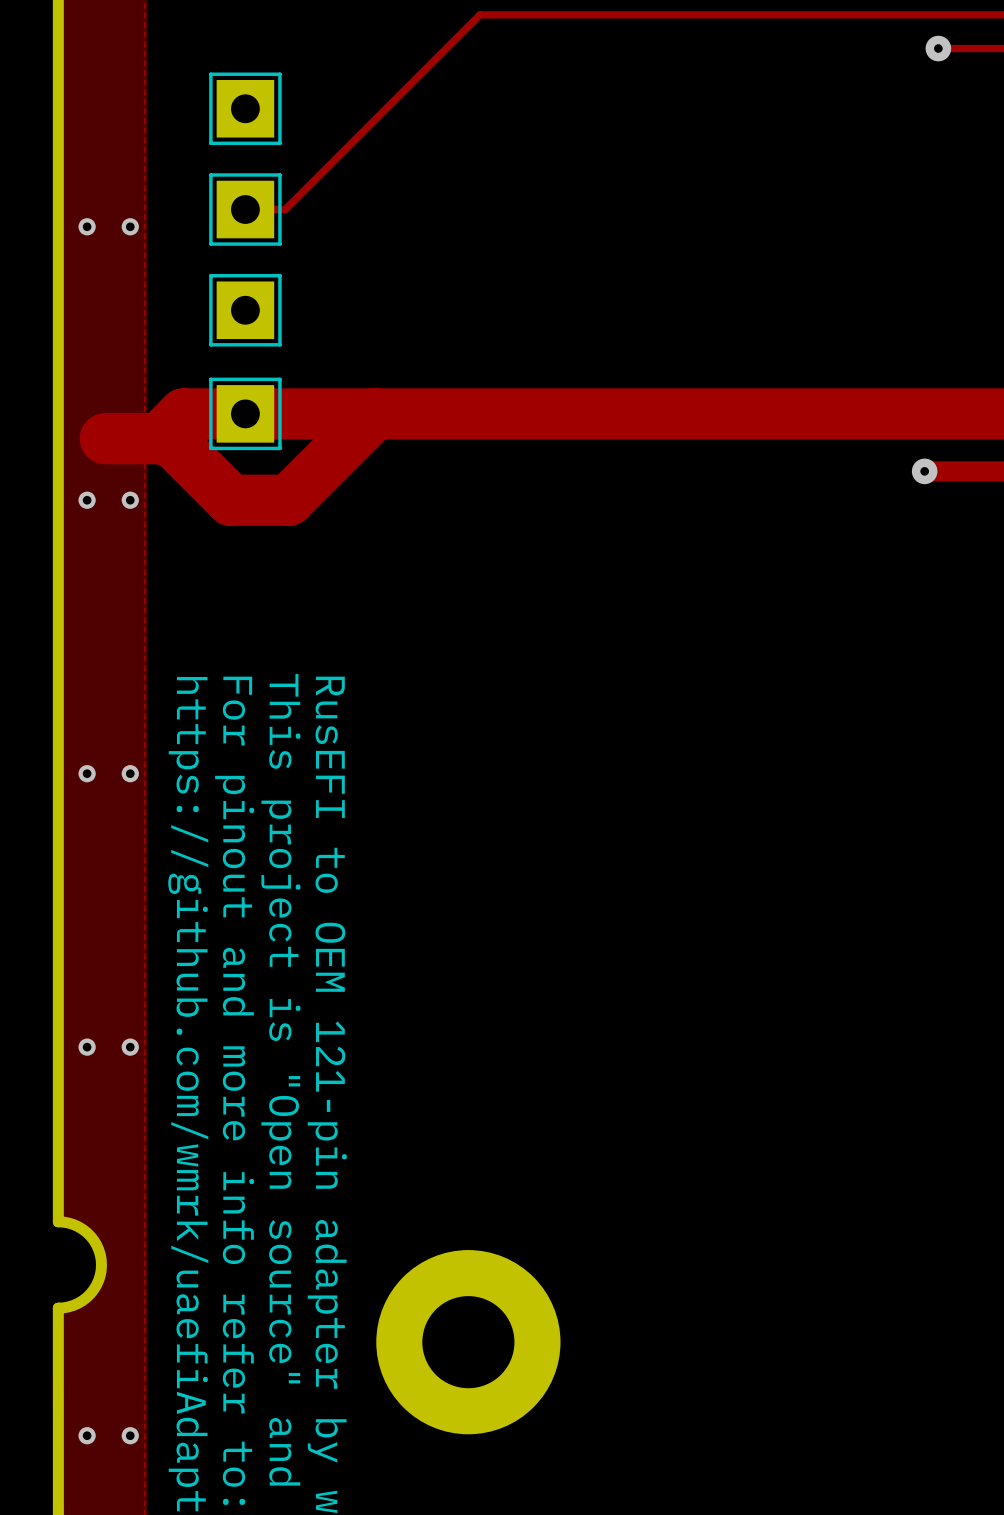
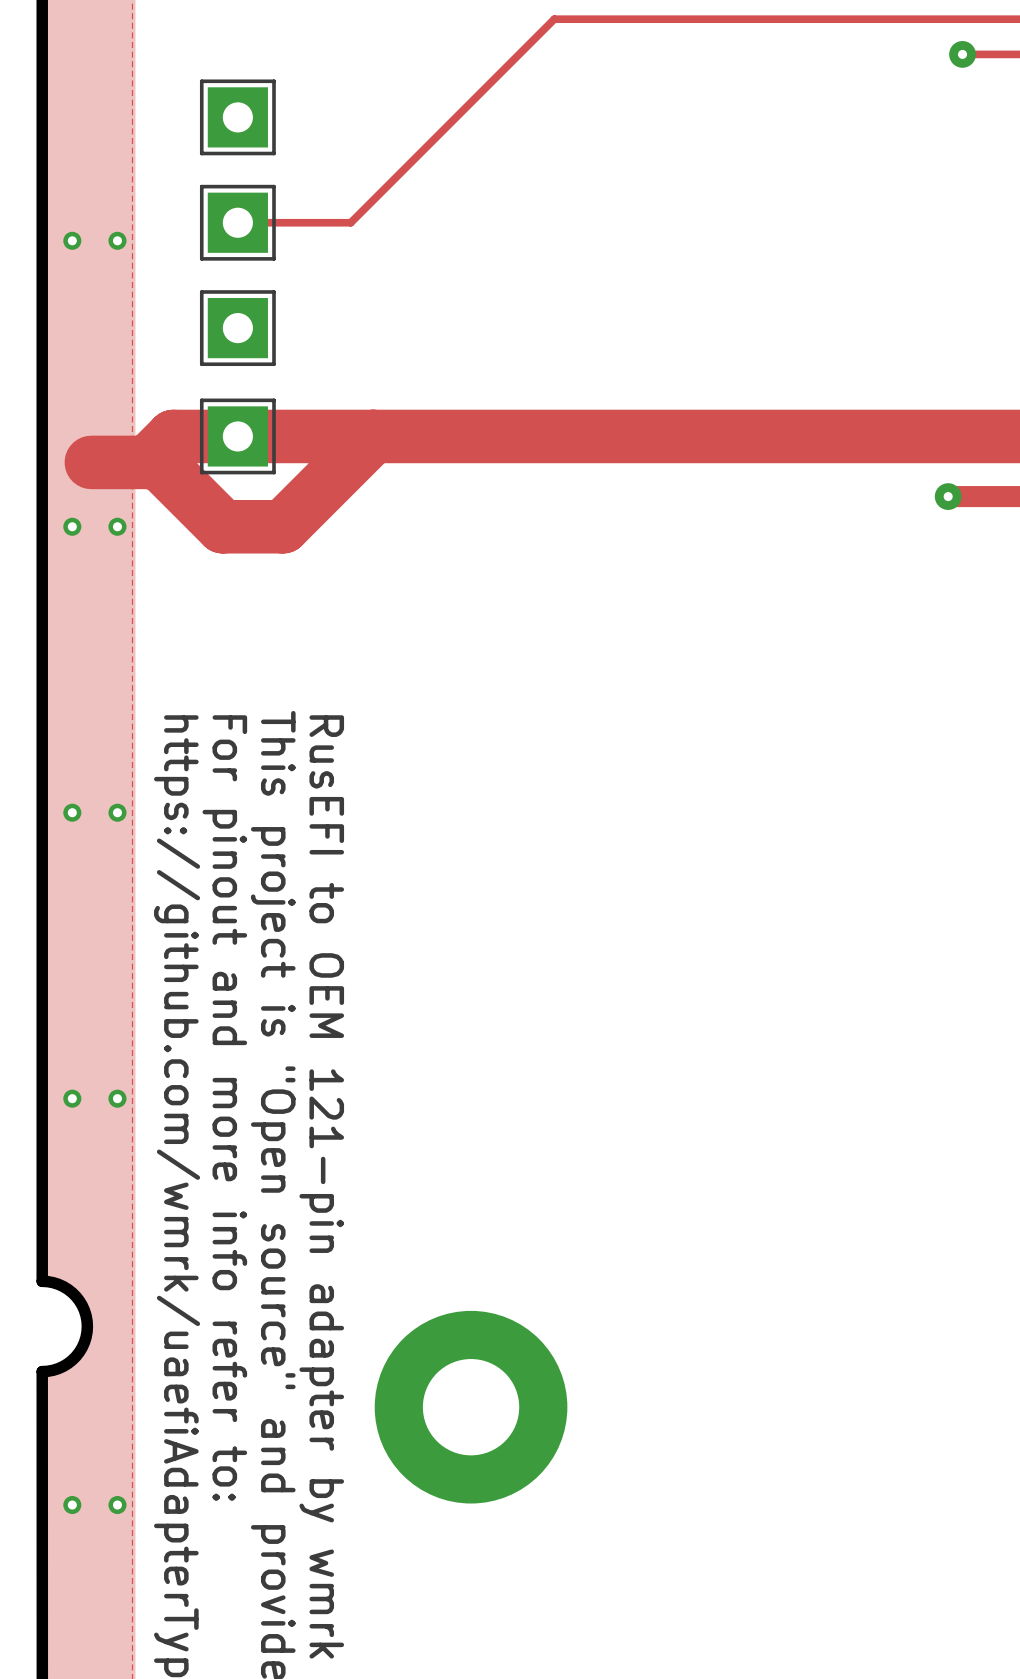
track: (548, 14) (479, 14) (285, 209) -> (554, 19) (350, 222) (279, 222)

